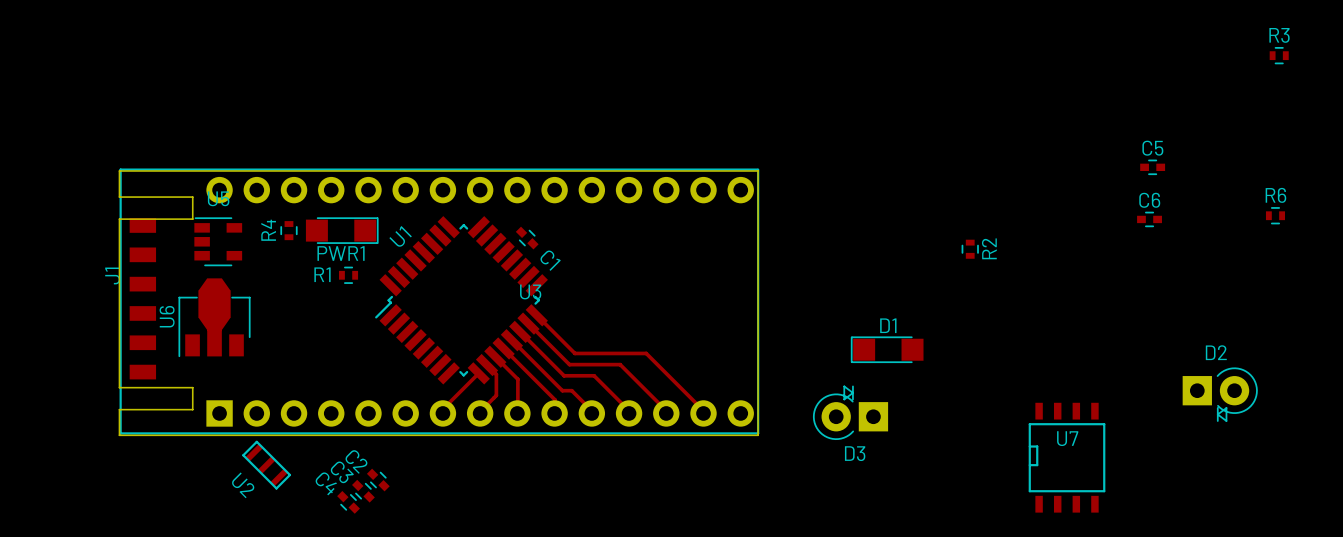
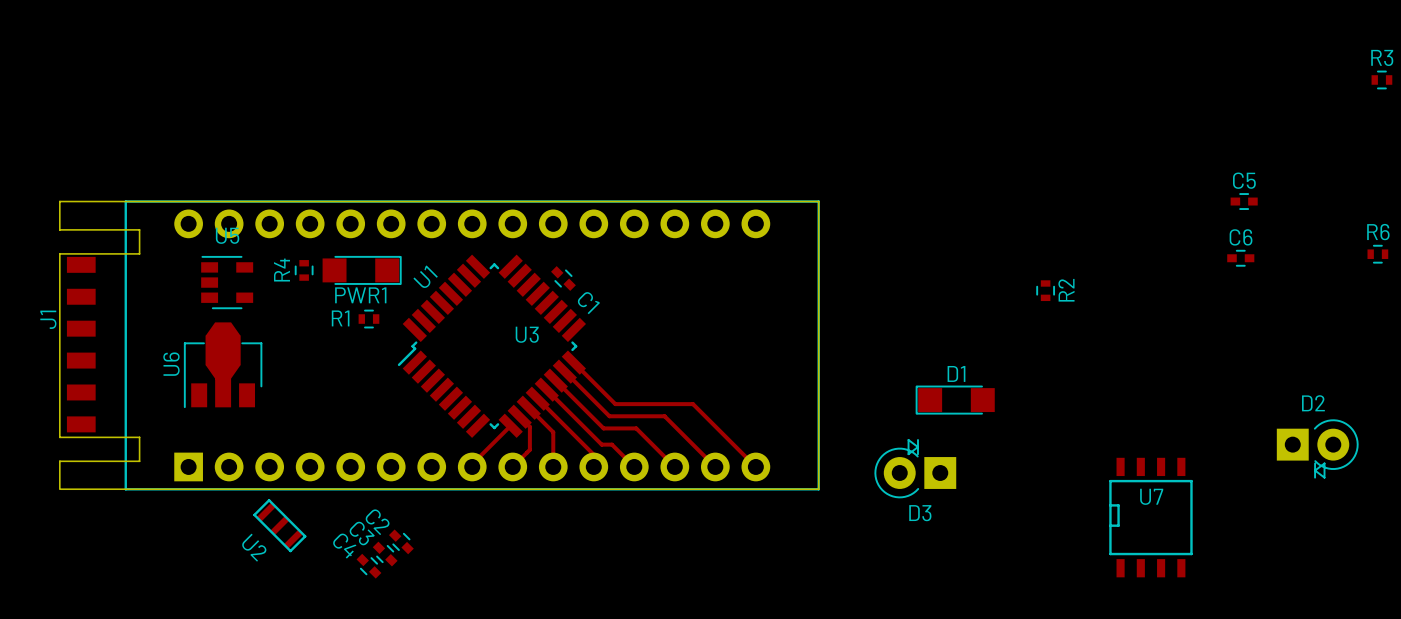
U3 footprint: [119, 168, 760, 435] -> [124, 200, 820, 491]
board edge: none -> (139, 229) (59, 229) (59, 201) (818, 201) (818, 489) (61, 489)
board edge: none -> (139, 229) (139, 253) (59, 253) (59, 437) (139, 437) (139, 461) (59, 461) (59, 489)
board edge: (192, 197) (119, 197) (119, 170) (758, 170) (758, 435) (119, 435) (119, 409) (192, 409) (192, 387) (119, 387) (119, 219) (192, 219) (192, 197) -> none
U3 name position: U3 (530, 291) -> U3 (527, 334)
J1 position: (142, 298) -> (81, 344)

